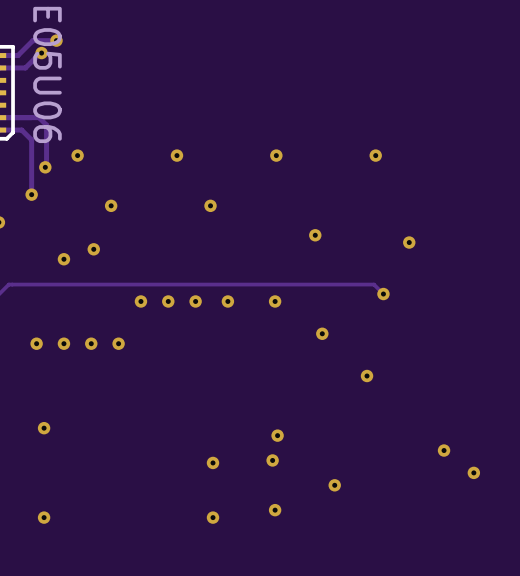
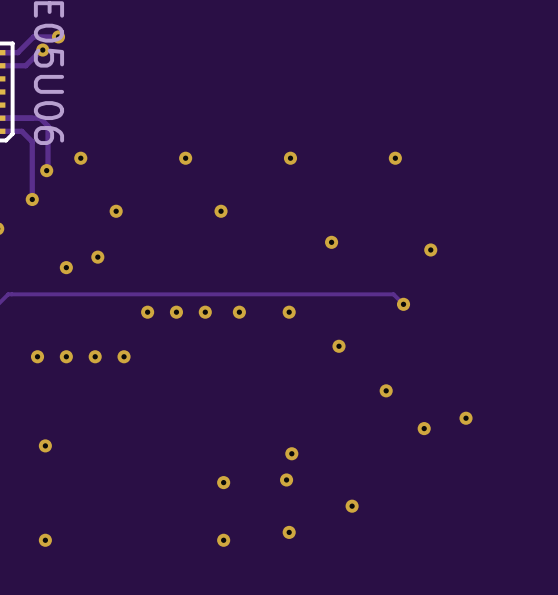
via: none -> (466, 418)
via: none -> (424, 428)
via: (444, 450) -> none
via: (473, 472) -> none

